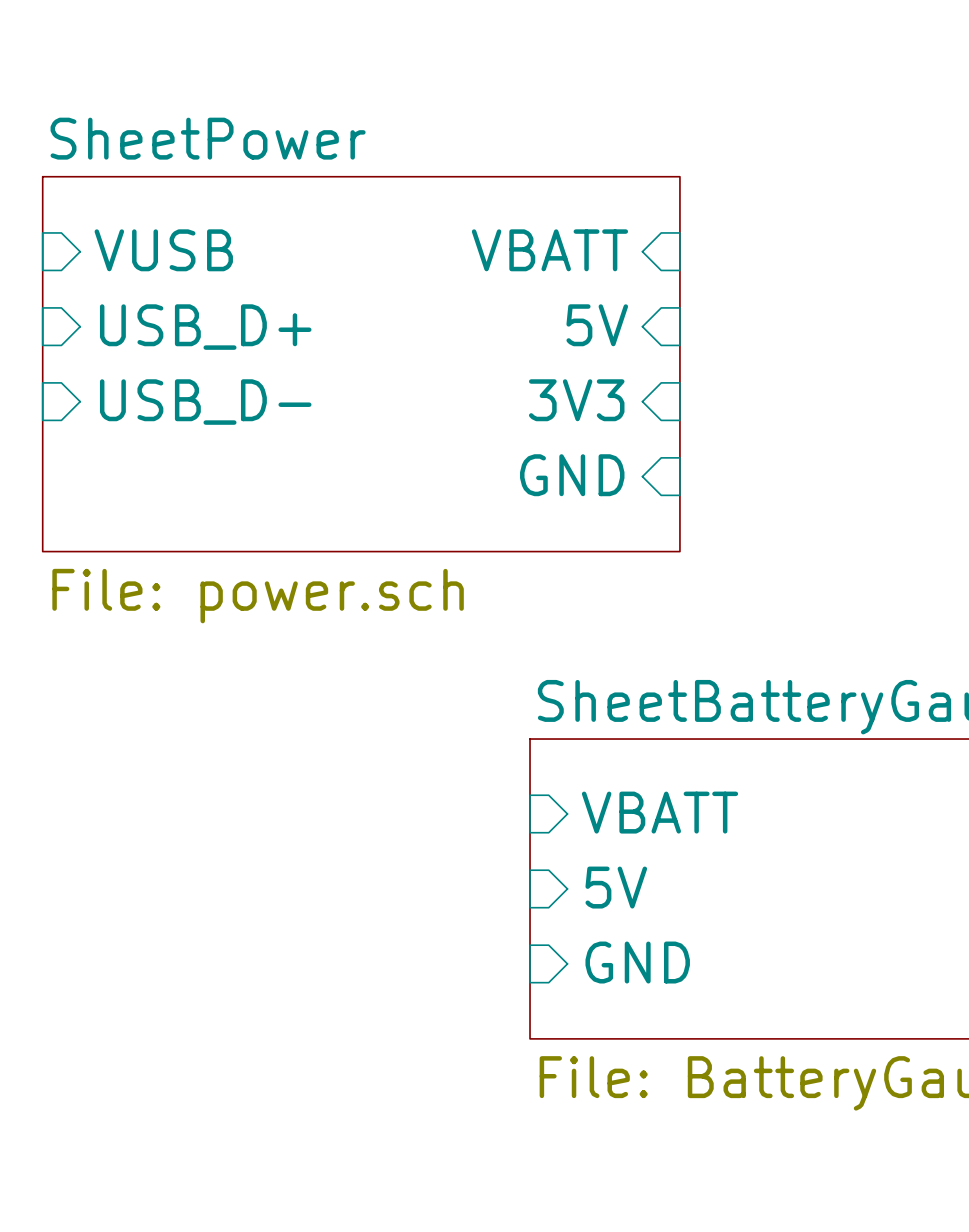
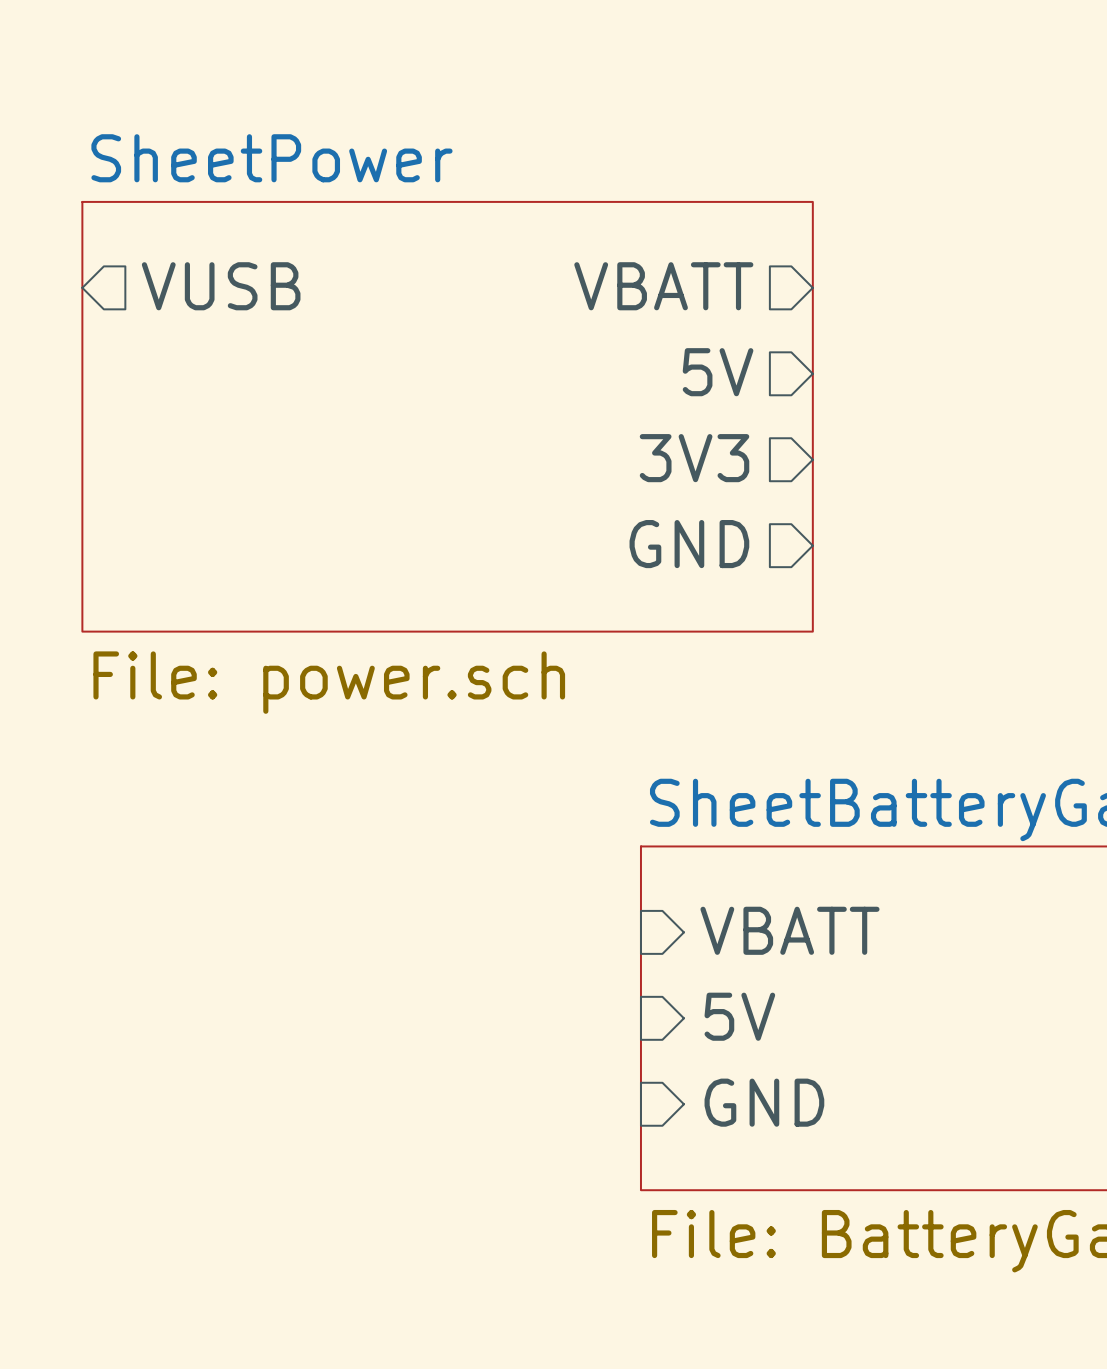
sheet pin shape: input (163, 250) -> output (221, 286)
sheet pin shape: input (549, 250) -> output (663, 286)
sheet pin shape: input (597, 325) -> output (718, 372)
sheet pin: USB_D+ (205, 327) -> none
sheet pin shape: input (576, 400) -> output (694, 458)
sheet pin: USB_D- (205, 402) -> none
sheet pin shape: input (572, 475) -> output (689, 544)

